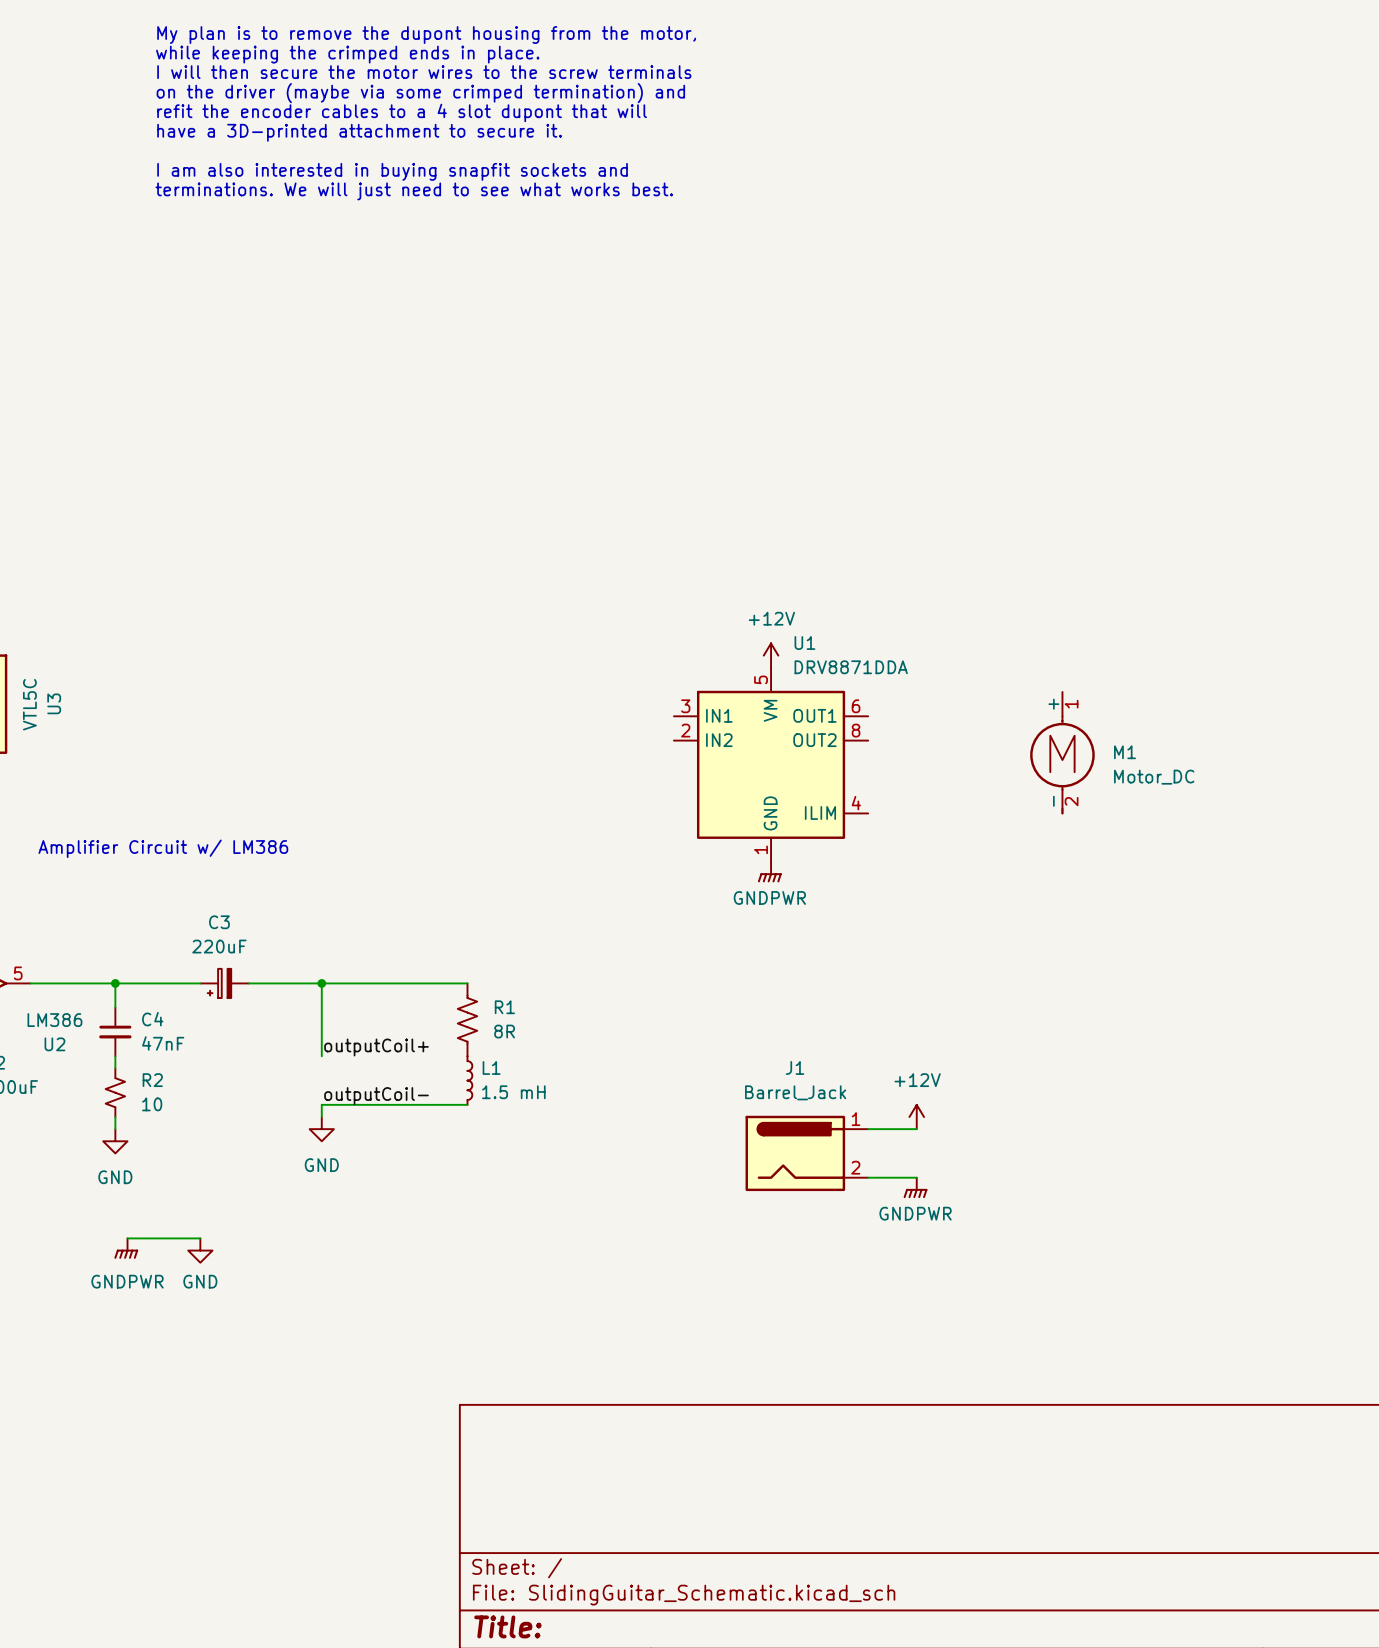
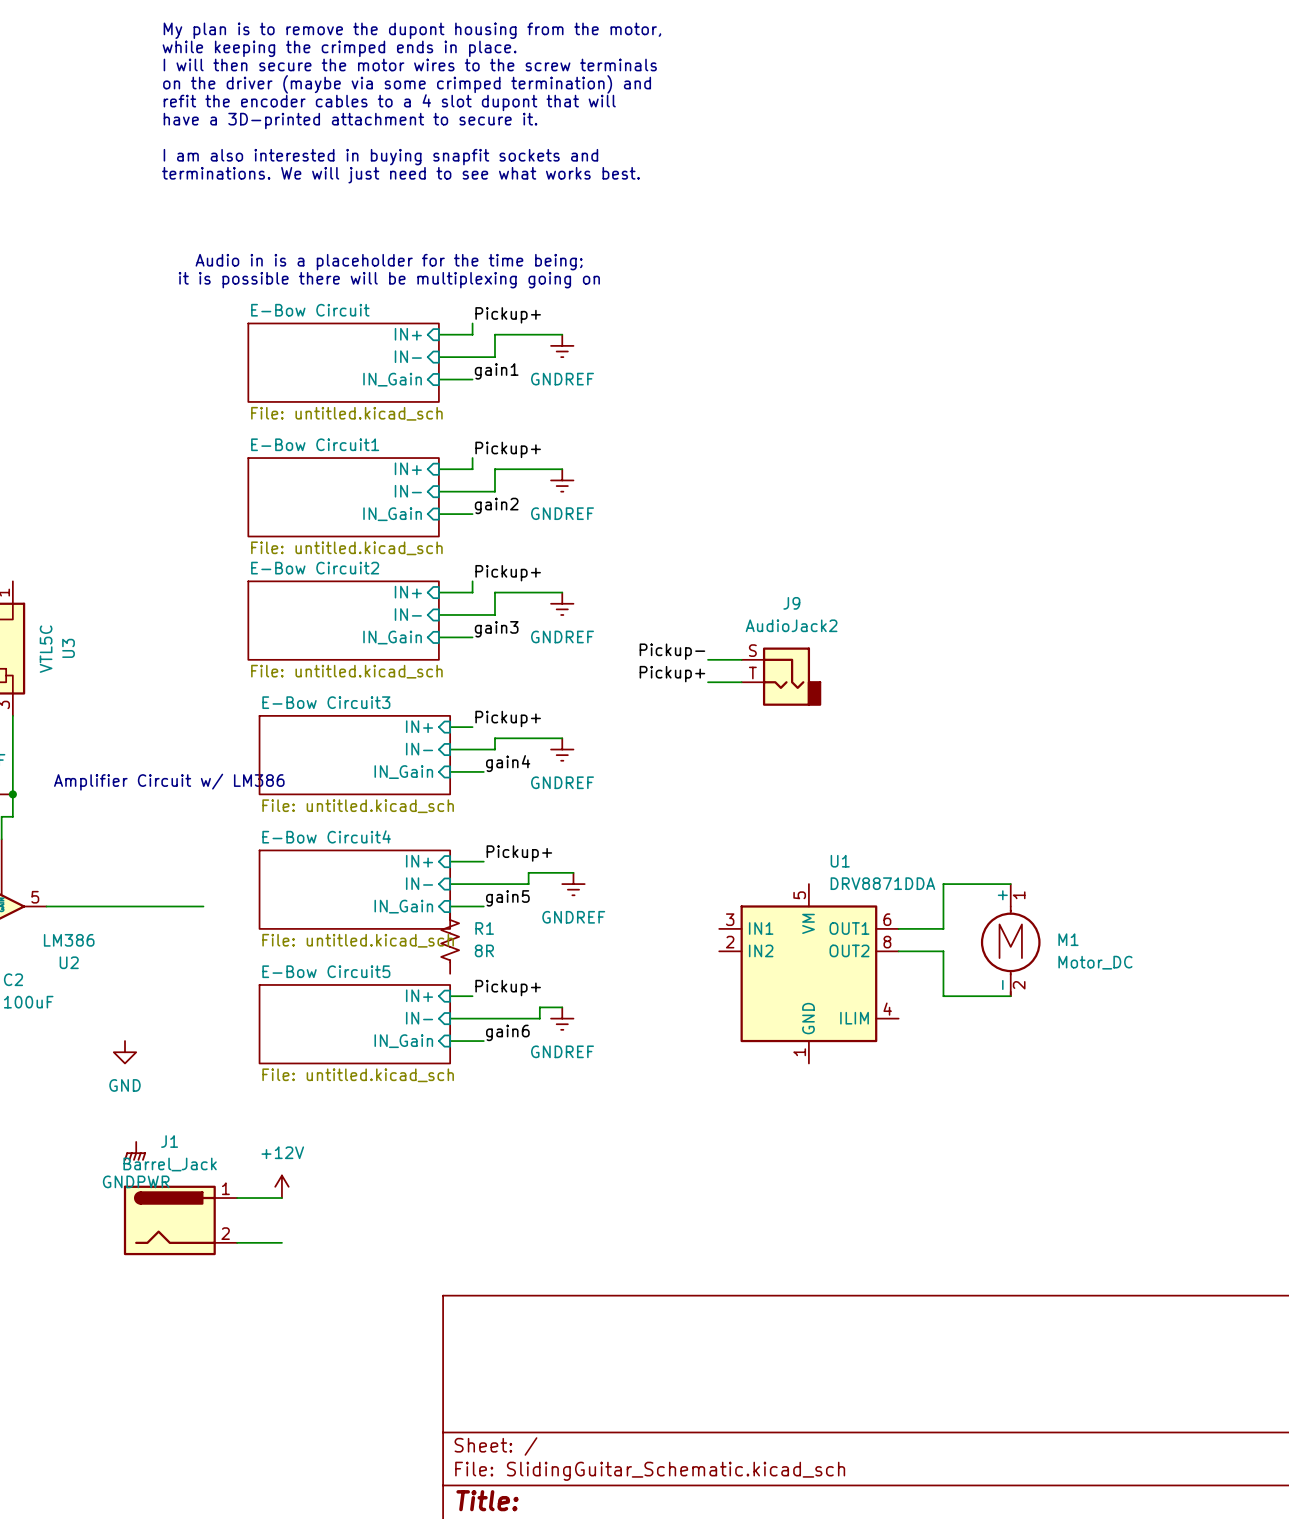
text: none -> Audio in is a placeholder for the time being; (389, 262)
text: none -> it is possible there will be multiplexing going on (389, 280)
label: none -> Pickup+ (508, 315)
wire: none -> (472, 323) (472, 334) (438, 334)
sheet pin: none -> IN+ (408, 334)
wire: none -> (562, 334) (494, 334) (494, 357) (438, 357)
power symbol: none -> GNDREF (562, 345)
sheet pin: none -> IN- (408, 356)
sheet E-Bow Circuit: none -> File: untitled.kicad_sch (343, 362)
label: none -> gain1 (496, 371)
sheet pin: none -> IN_Gain (392, 379)
wire: none -> (438, 379) (472, 379)
label: none -> Pickup+ (508, 449)
wire: none -> (472, 458) (472, 469) (438, 469)
sheet pin: none -> IN+ (408, 468)
wire: none -> (562, 469) (494, 469) (494, 491) (438, 491)
power symbol: none -> GNDREF (562, 480)
sheet pin: none -> IN- (408, 491)
sheet E-Bow Circuit1: none -> File: untitled.kicad_sch (343, 497)
label: none -> gain2 (496, 505)
sheet pin: none -> IN_Gain (392, 514)
wire: none -> (438, 514) (472, 514)
label: none -> Pickup+ (508, 573)
wire: none -> (472, 581) (472, 592) (438, 592)
sheet pin: none -> IN+ (408, 592)
wire: none -> (562, 592) (494, 592) (494, 614) (438, 614)
power symbol: none -> GNDREF (562, 603)
power symbol: +12V (771, 655) -> none
sheet pin: none -> IN- (408, 614)
sheet E-Bow Circuit2: none -> File: untitled.kicad_sch (343, 620)
label: none -> gain3 (496, 629)
sheet pin: none -> IN_Gain (392, 637)
wire: none -> (438, 637) (472, 637)
label: none -> Pickup- (672, 651)
label: none -> Pickup+ (672, 674)
J9: none -> AudioJack2 (781, 676)
M1 position: (1062, 752) -> (1010, 940)
U1 position: (771, 764) -> (808, 973)
label: none -> Pickup+ (508, 718)
sheet pin: none -> IN+ (419, 726)
wire: none -> (450, 727) (472, 727)
wire: none -> (562, 738) (494, 738) (494, 749) (450, 749)
sheet pin: none -> IN- (419, 749)
power symbol: none -> GNDREF (562, 749)
sheet E-Bow Circuit3: none -> File: untitled.kicad_sch (354, 755)
label: none -> gain4 (508, 763)
sheet pin: none -> IN_Gain (403, 772)
wire: none -> (450, 771) (483, 771)
power symbol: GNDPWR (769, 872) -> none
label: none -> Pickup+ (519, 853)
sheet pin: none -> IN+ (419, 861)
wire: none -> (450, 861) (483, 861)
wire: none -> (573, 872) (528, 872) (528, 884) (450, 884)
sheet pin: none -> IN- (419, 883)
power symbol: none -> GNDREF (573, 884)
wire: none -> (1010, 884) (943, 884) (943, 928) (898, 928)
sheet E-Bow Circuit4: none -> File: untitled.kicad_sch (354, 889)
label: none -> gain5 (507, 898)
wire: (115, 983) (115, 1007) -> none
junction: (115, 983) -> none
C3: 220uF (224, 983) -> none
wire: (248, 983) (467, 983) -> (483, 906) (450, 906)
wire: (321, 983) (321, 1056) -> none
junction: (321, 983) -> none
sheet pin: none -> IN_Gain (403, 906)
C4: 47nF (115, 1032) -> none
wire: none -> (898, 951) (943, 951) (943, 996) (1010, 996)
label: outputCoil+ (376, 1047) -> none
wire: (115, 1056) (115, 1068) -> none
label: none -> Pickup+ (508, 988)
sheet pin: none -> IN+ (419, 995)
wire: none -> (450, 996) (472, 996)
L1: 1.5 mH (469, 1080) -> none
R2: 10 (115, 1092) -> none
label: outputCoil- (376, 1096) -> none
sheet pin: none -> IN- (419, 1018)
wire: (467, 1104) (321, 1104) (321, 1117) -> (450, 1018) (539, 1018) (539, 1007) (562, 1007)
power symbol: none -> GNDREF (562, 1018)
sheet E-Bow Circuit5: none -> File: untitled.kicad_sch (354, 1024)
wire: (115, 1117) (115, 1129) -> none
power symbol: +12V (916, 1117) -> none
label: none -> gain6 (507, 1032)
power symbol: GND (321, 1129) -> none
sheet pin: none -> IN_Gain (403, 1041)
wire: none -> (450, 1041) (483, 1041)
J1 position: (806, 1153) -> (180, 1220)
wire: (868, 1177) (916, 1177) -> none
power symbol: GNDPWR (915, 1187) -> none
wire: (127, 1238) (200, 1238) -> none
power symbol: GND (200, 1250) -> none
power symbol: none -> +12V (281, 1186)
wire: none -> (237, 1198) (281, 1198)
wire: none -> (237, 1242) (281, 1242)

